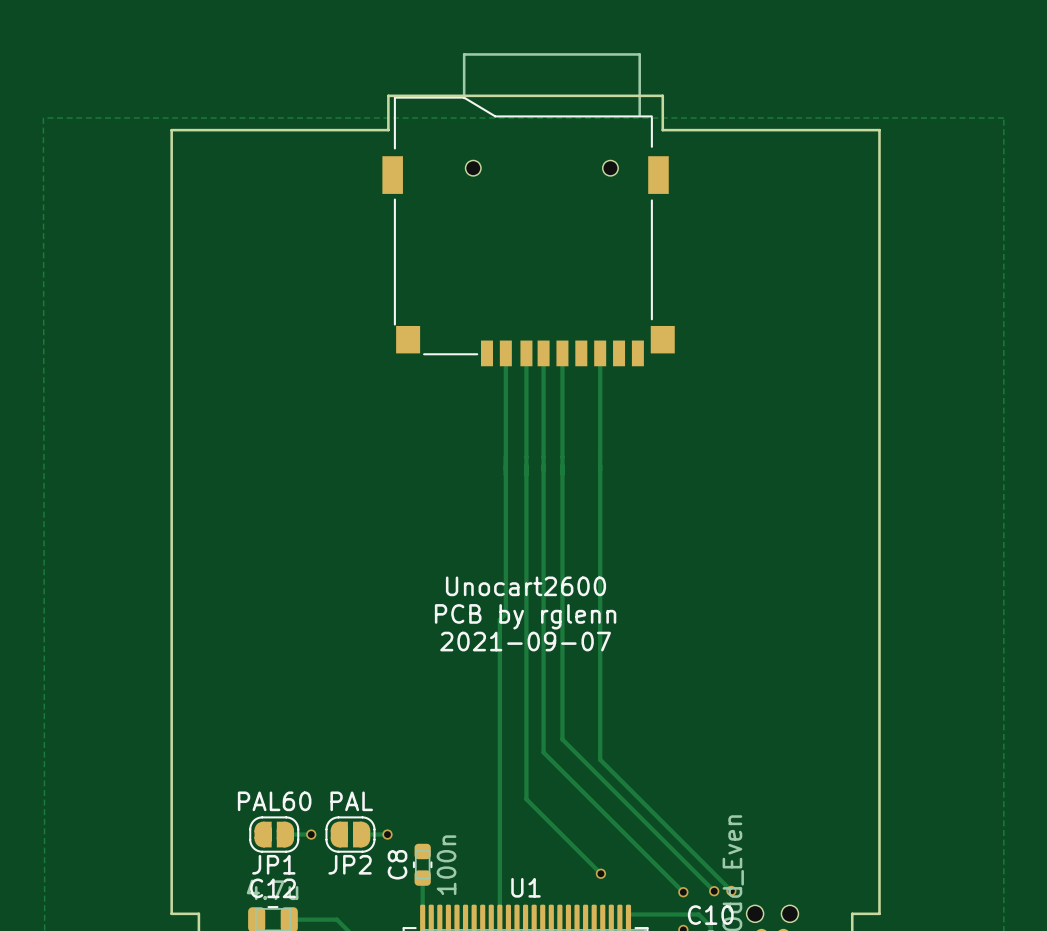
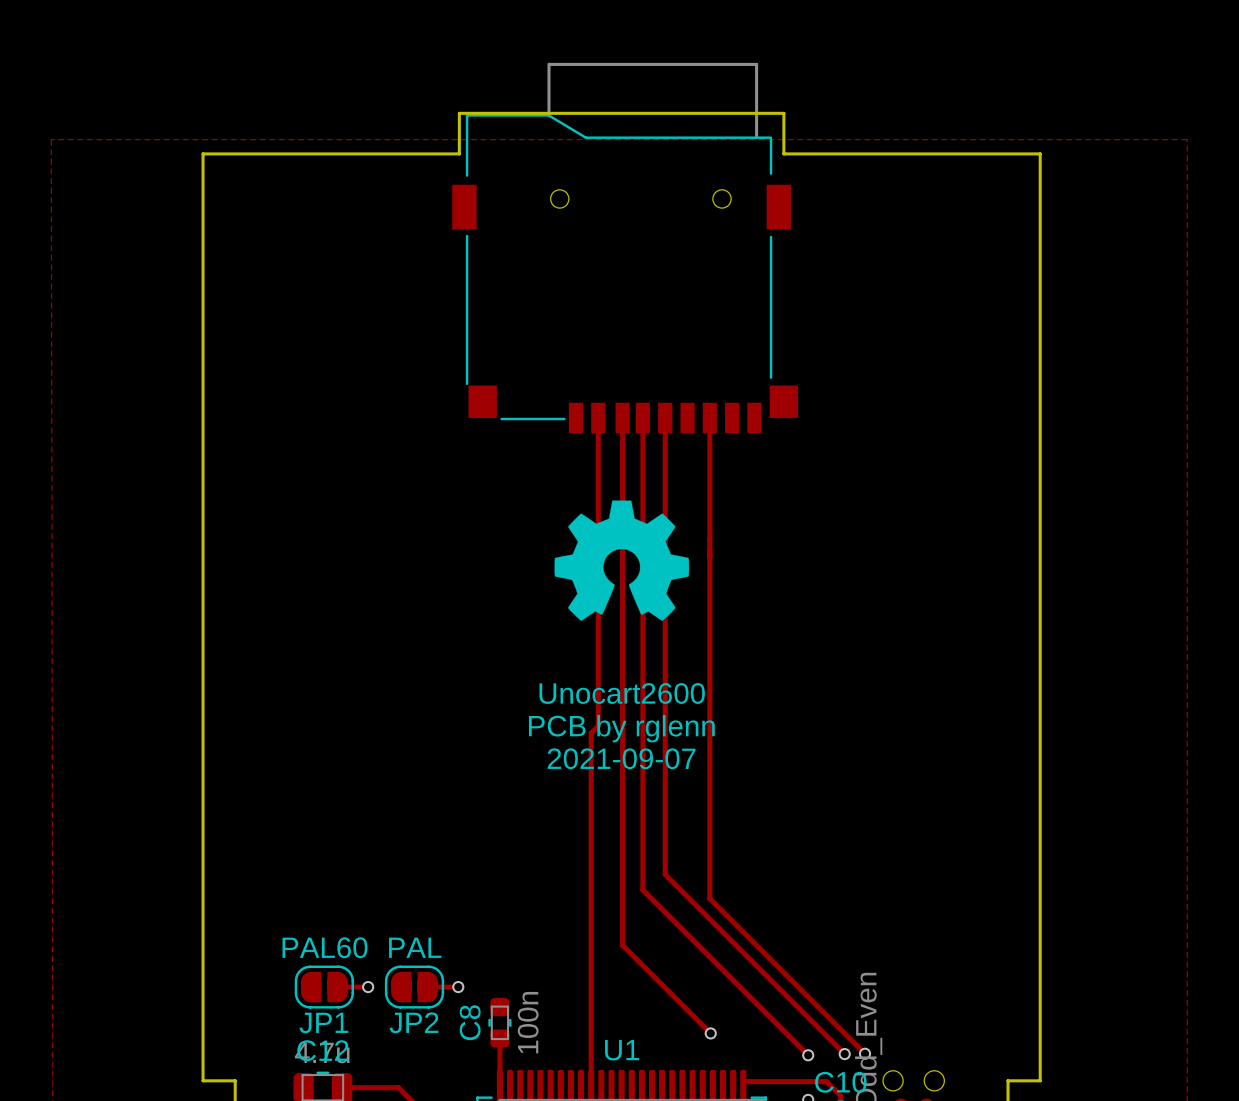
drawing: none -> [554, 500, 690, 621]

